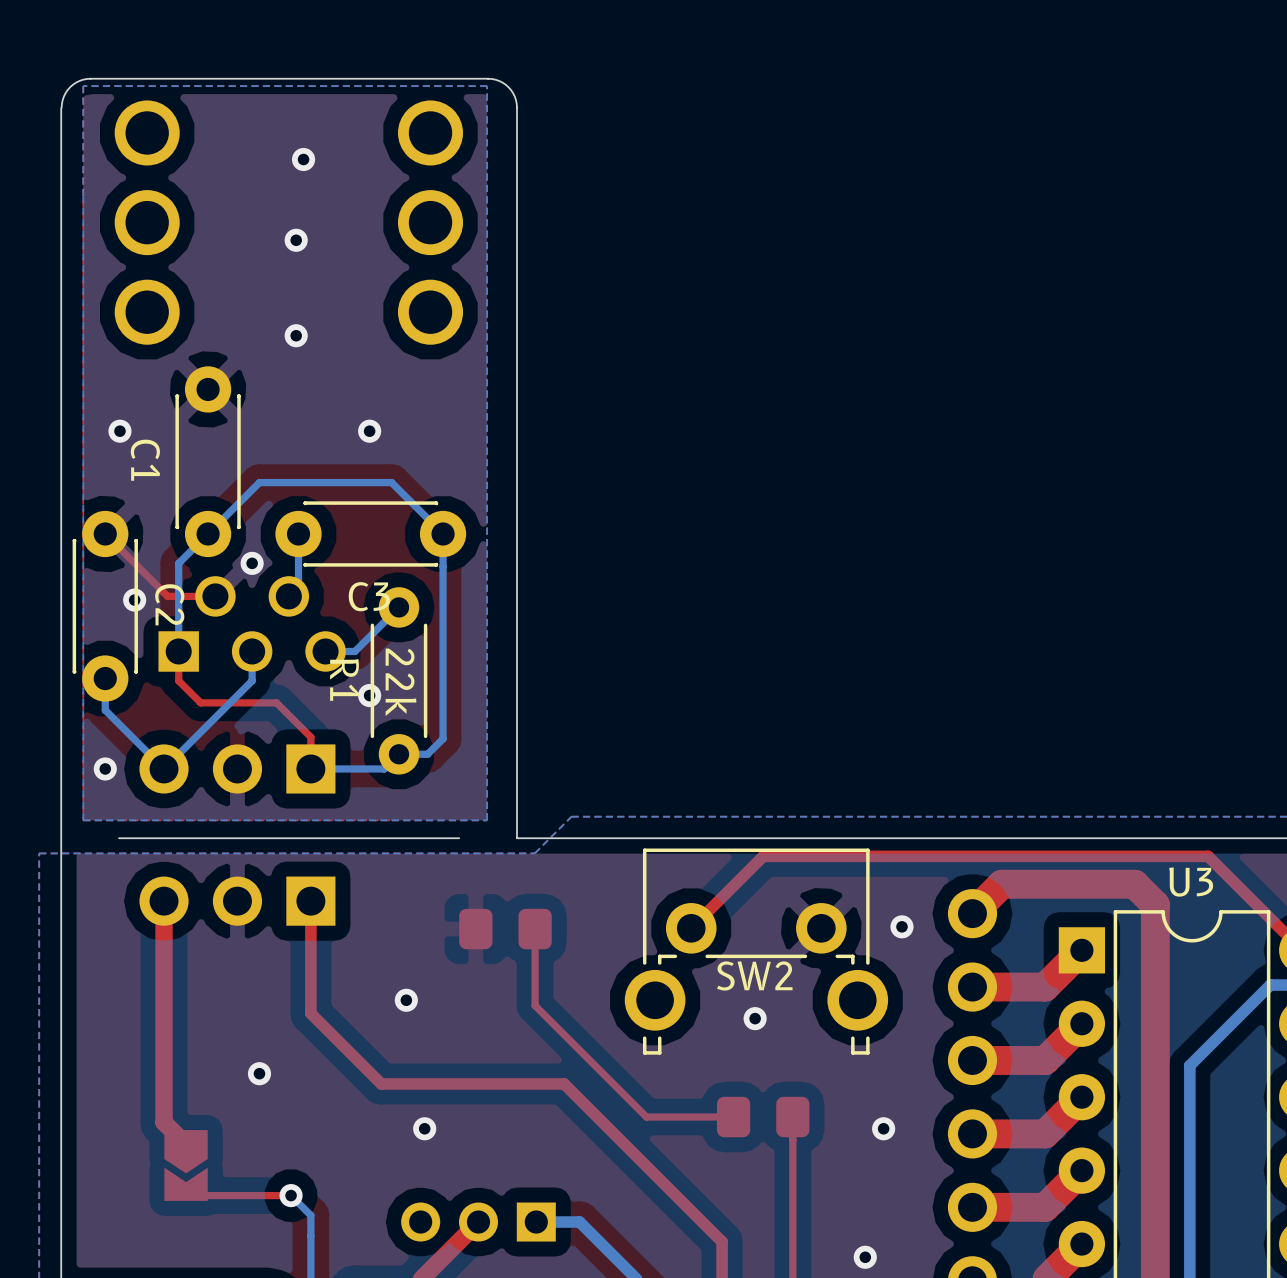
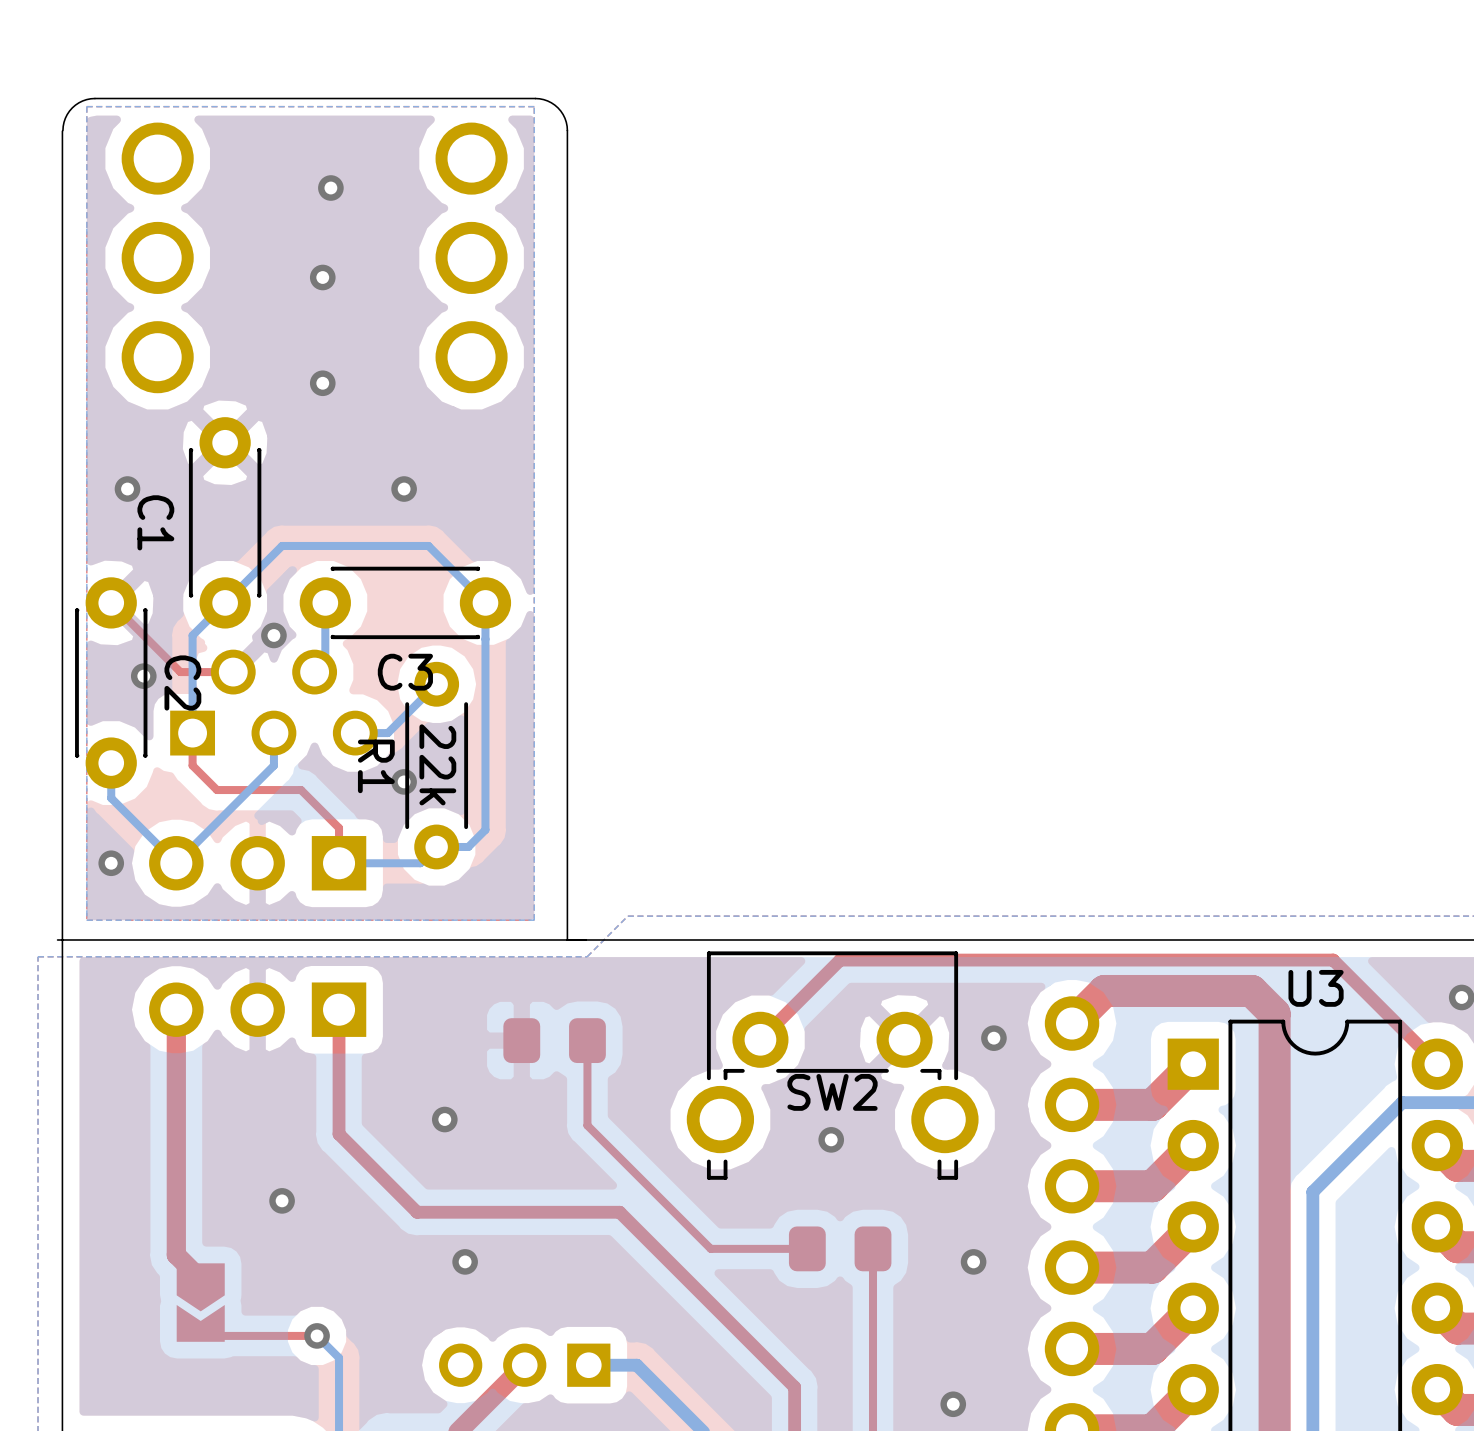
board edge: none -> (126, 940) (57, 940)
board edge: none -> (567, 940) (503, 940)

